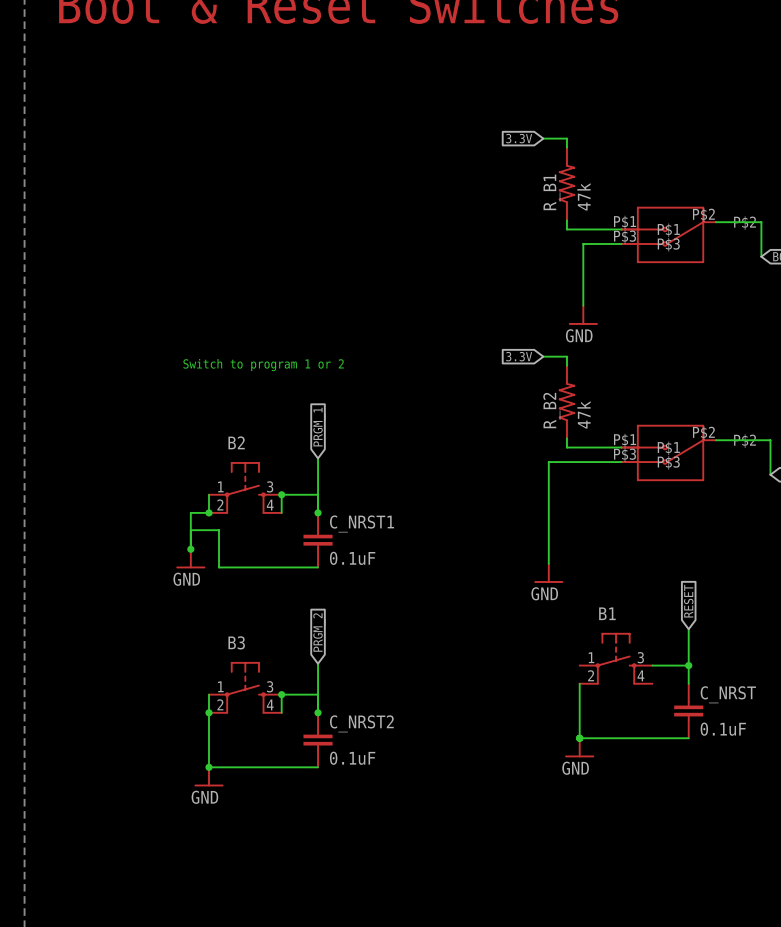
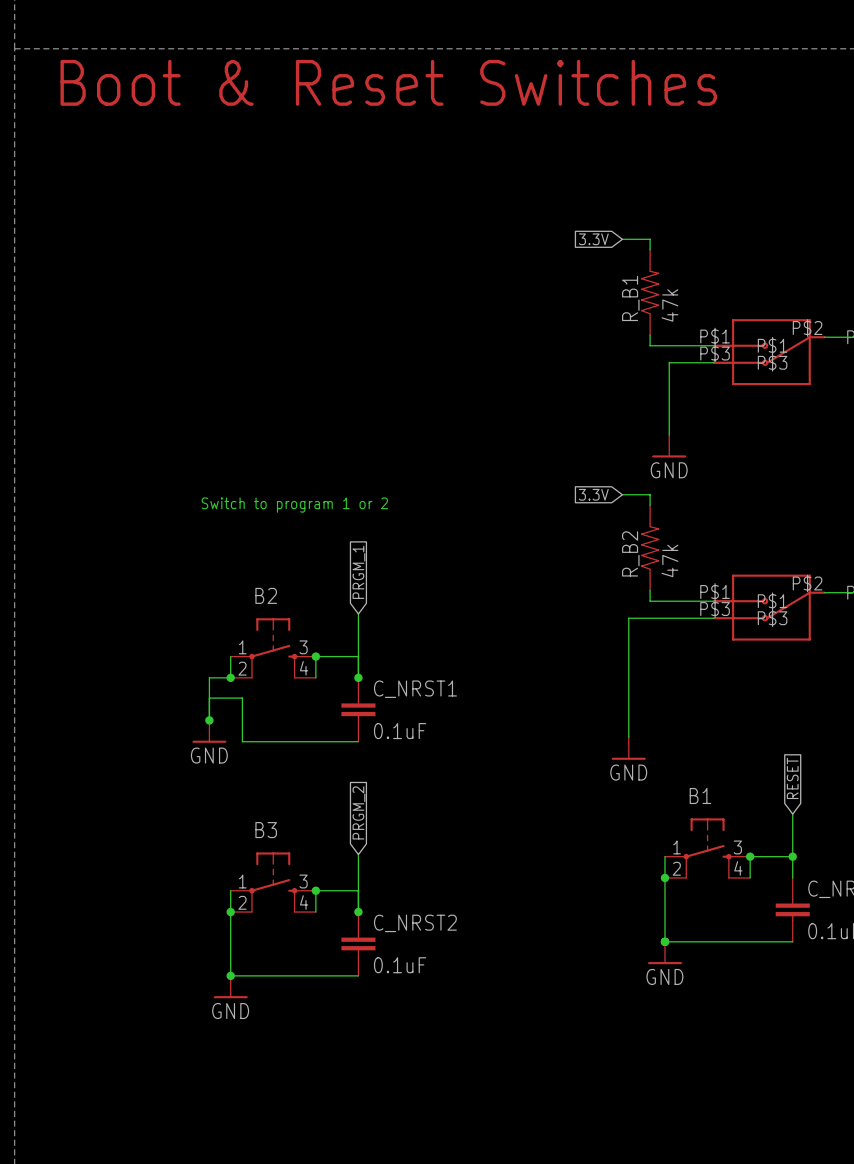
wire: none -> (664, 856) (664, 877)
wire: none -> (750, 856) (750, 877)
junction: none -> (750, 856)
junction: none -> (664, 877)

